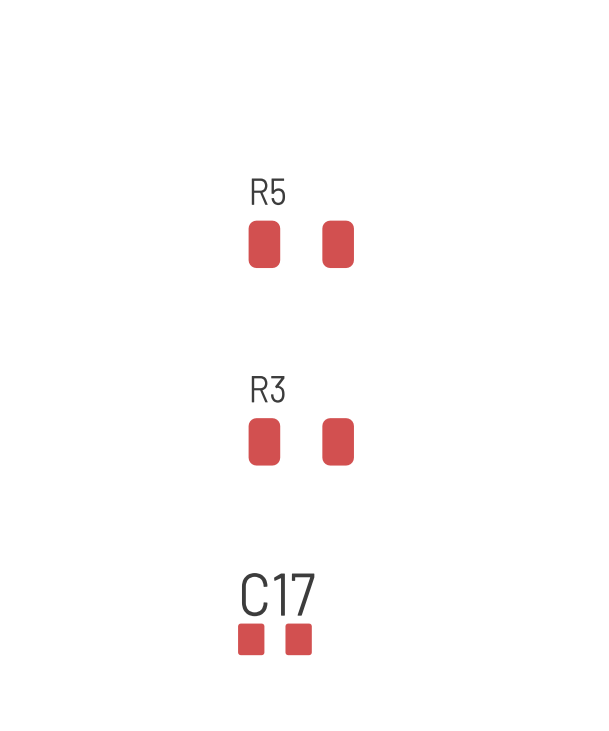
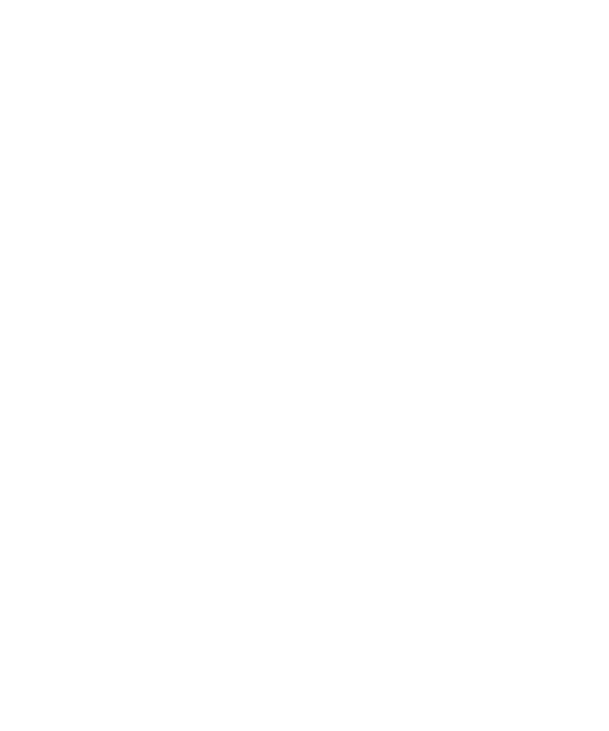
R5: (301, 244) -> none
R3: (301, 441) -> none
C17: (274, 639) -> none

